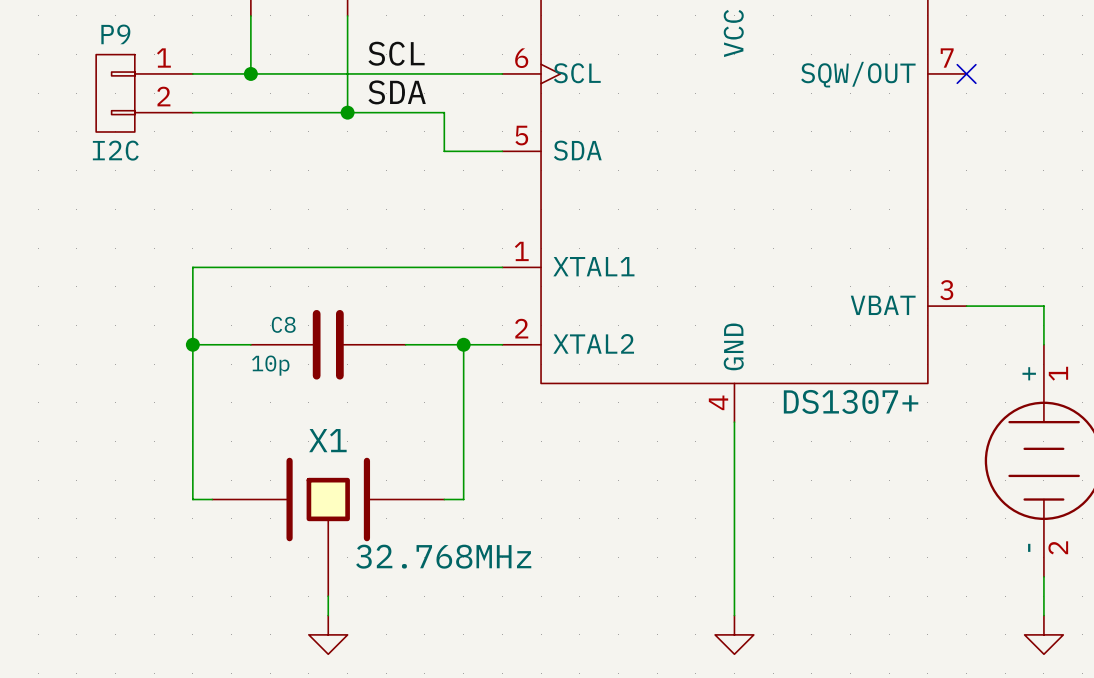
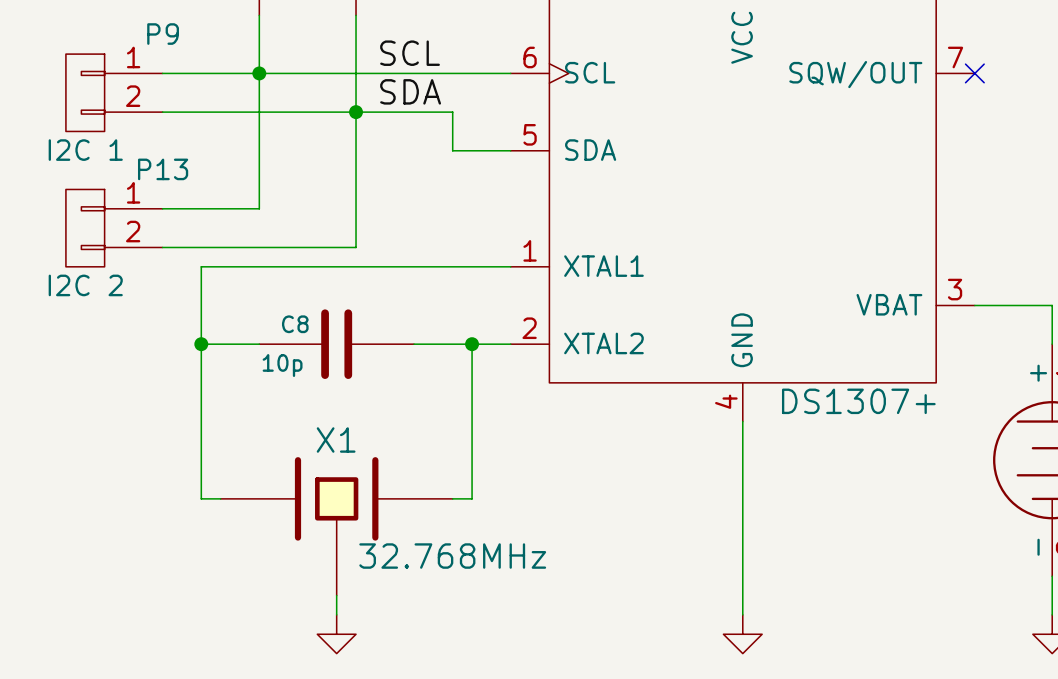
P9 name position: P9 (115, 34) -> P9 (163, 34)
wire: none -> (259, 73) (259, 208) (162, 208)
P9 position: (144, 93) -> (114, 92)
wire: none -> (356, 112) (356, 247) (162, 247)
P9 value: I2C (115, 150) -> I2C 1 (85, 150)
P13: none -> I2C 2 (114, 228)

